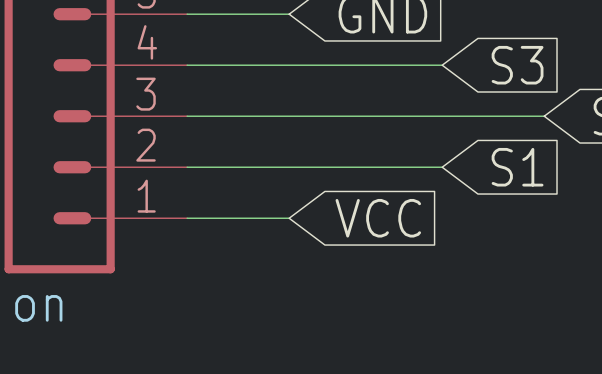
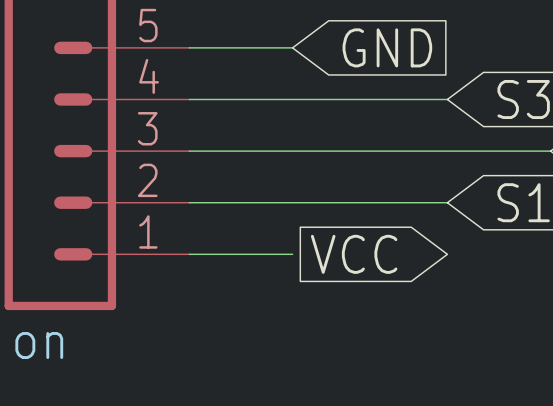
global label rotation: 0° (378, 218) -> 180° (354, 254)

